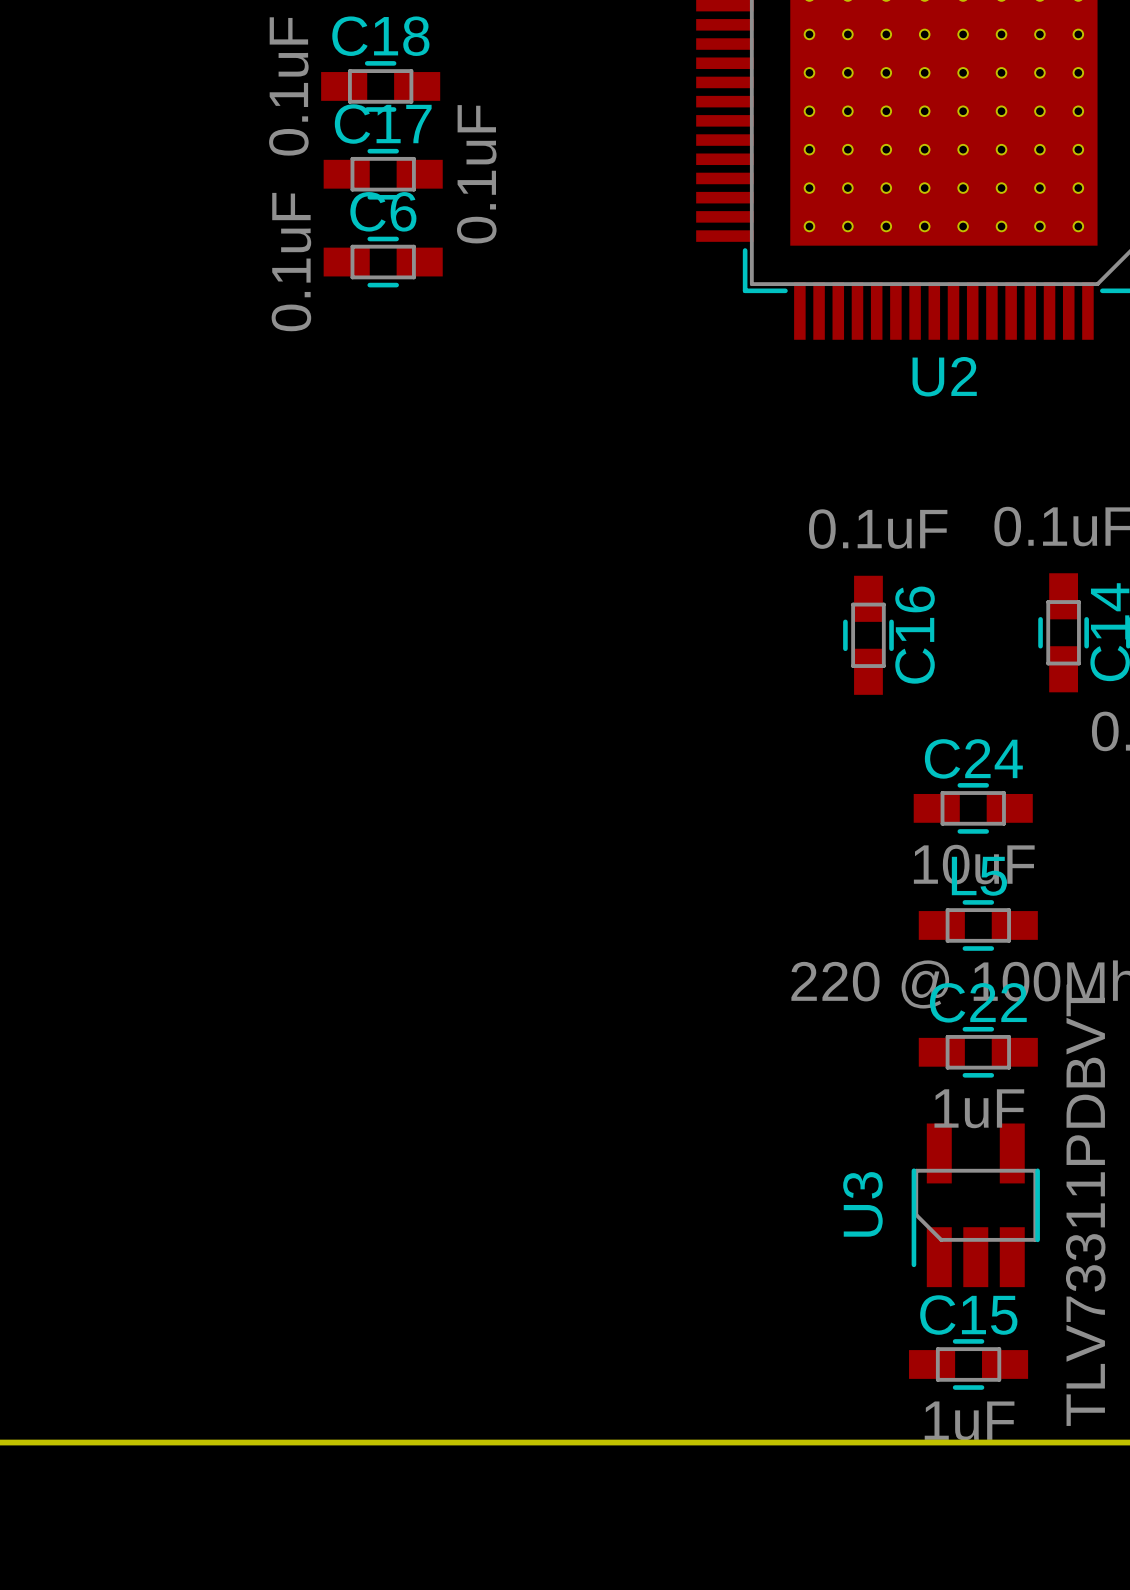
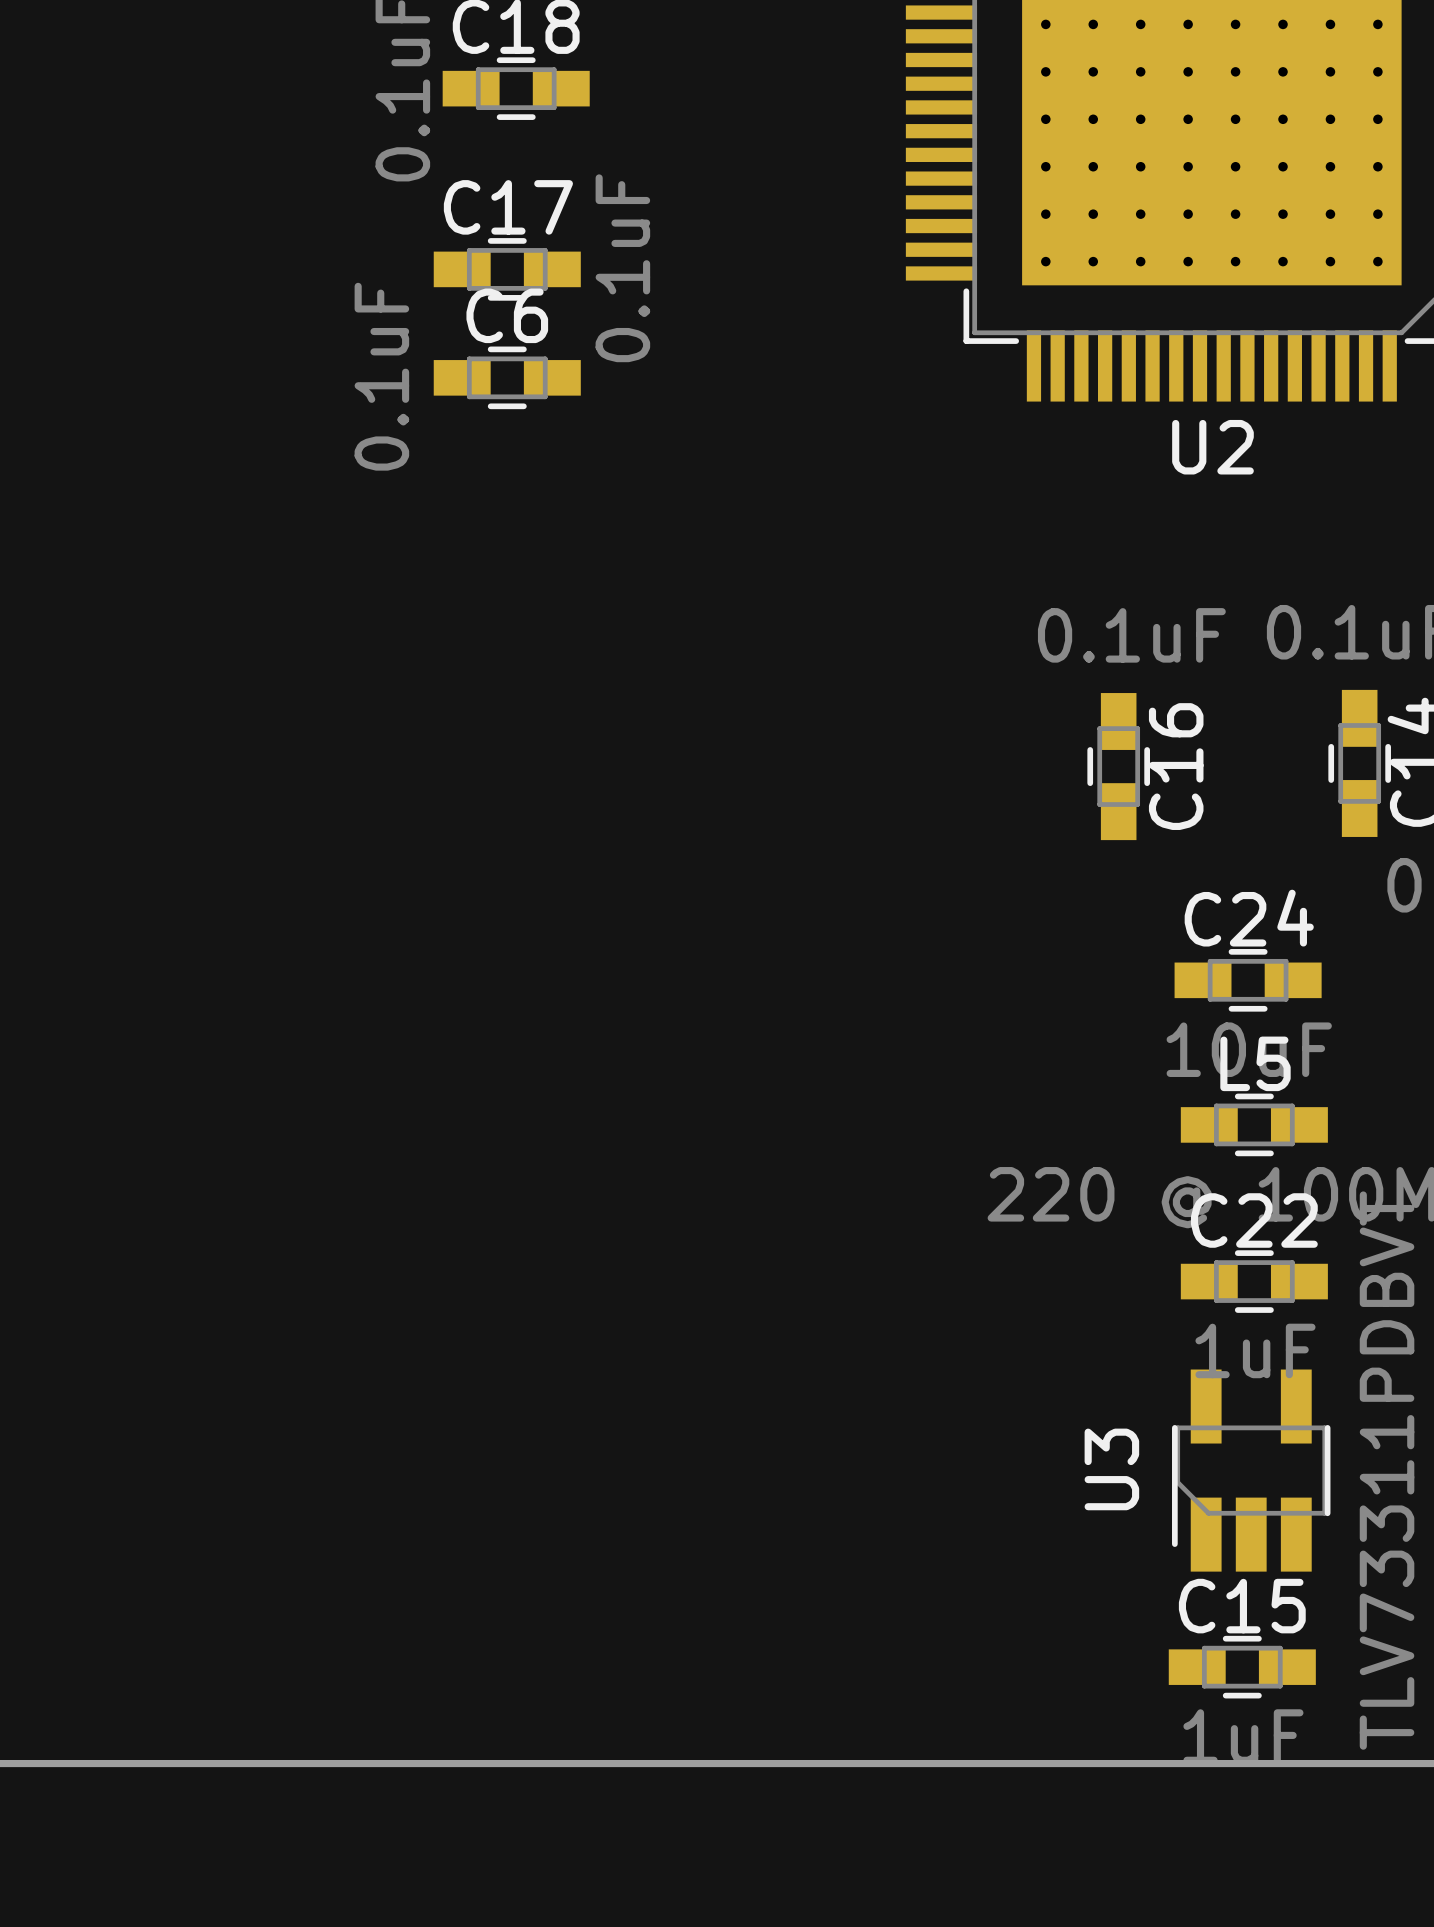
C17 position: (383, 174) -> (507, 269)
C6 value position: 0.1uF (291, 262) -> 0.1uF (381, 376)
C6 position: (383, 262) -> (507, 377)

